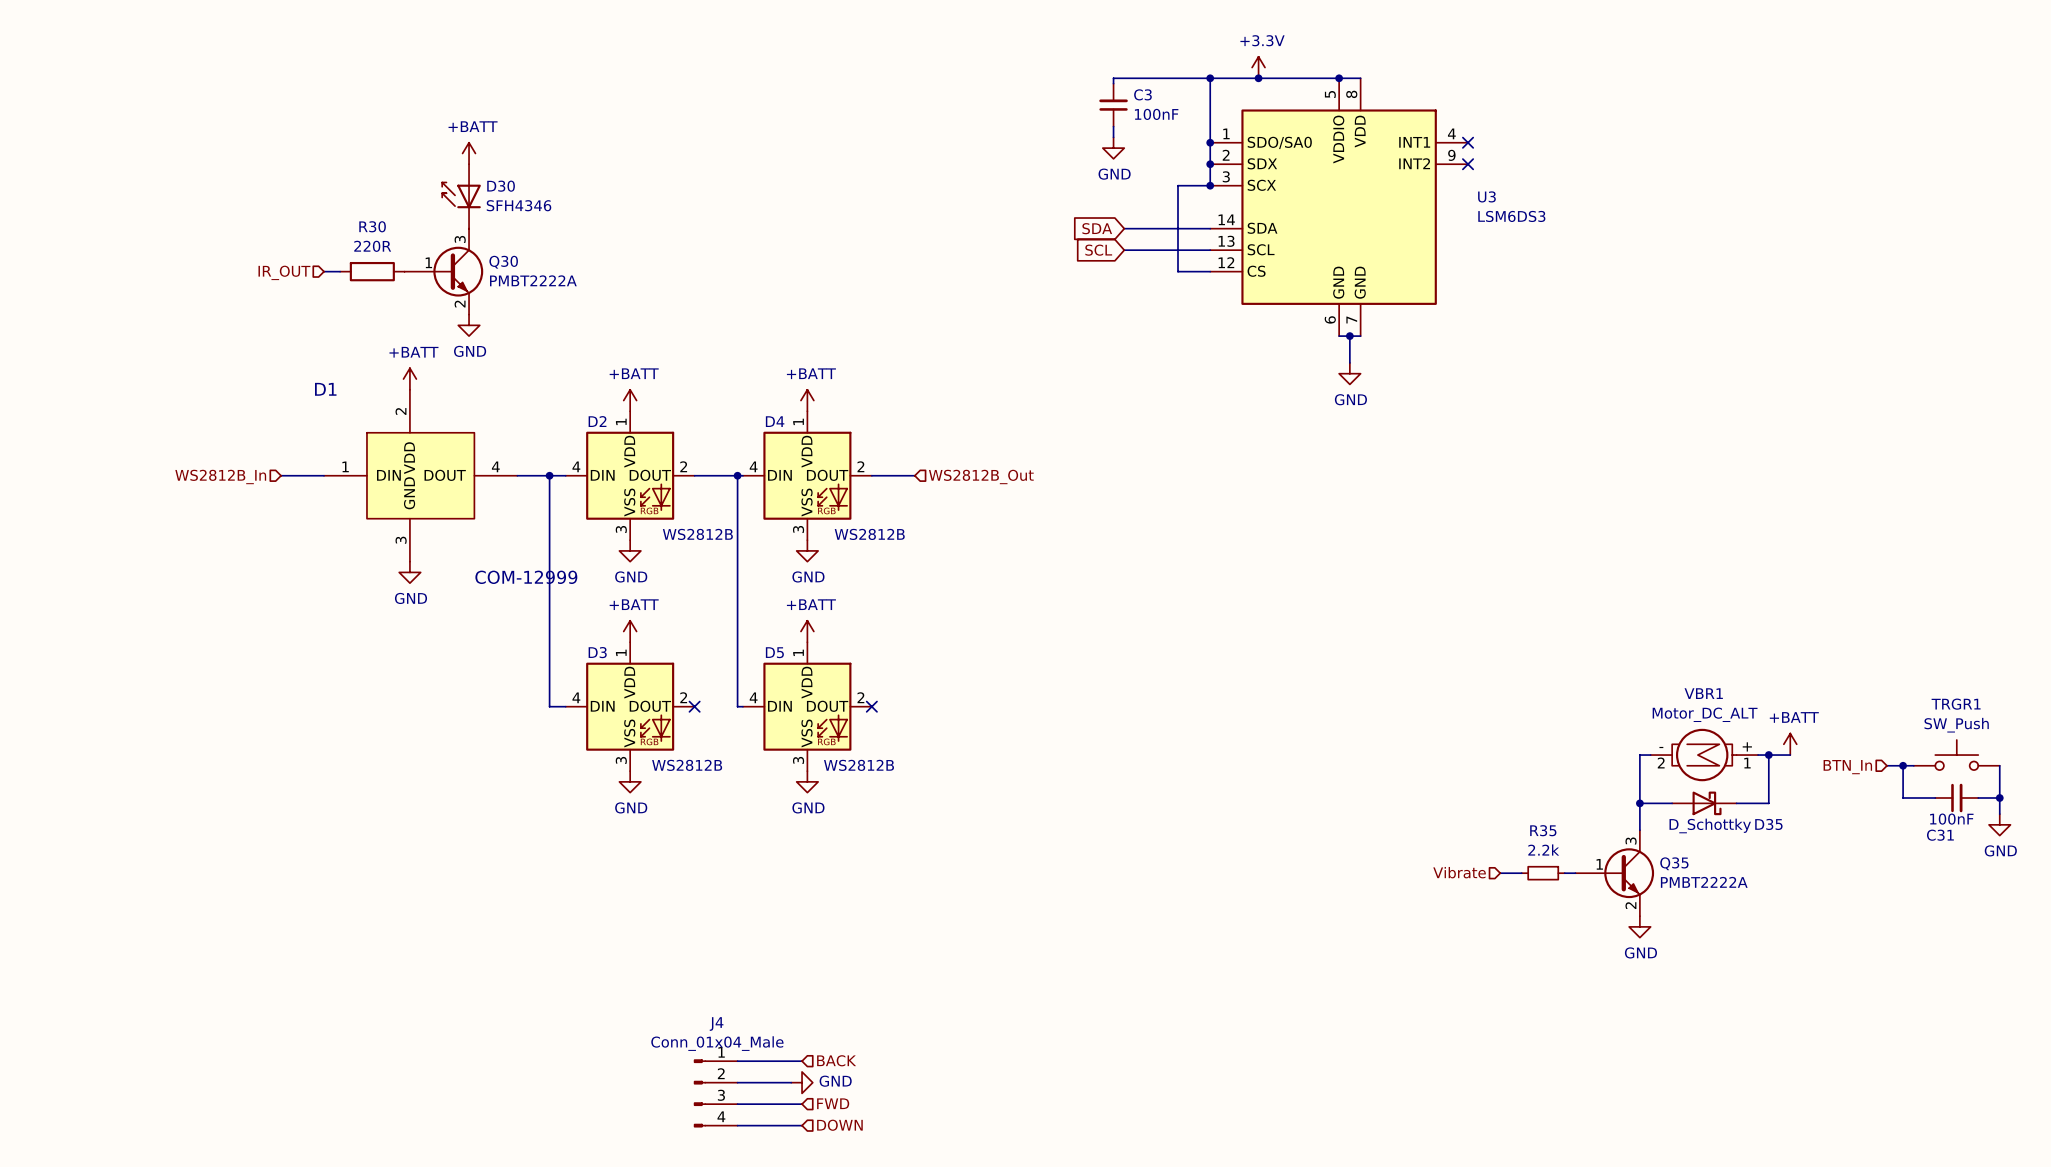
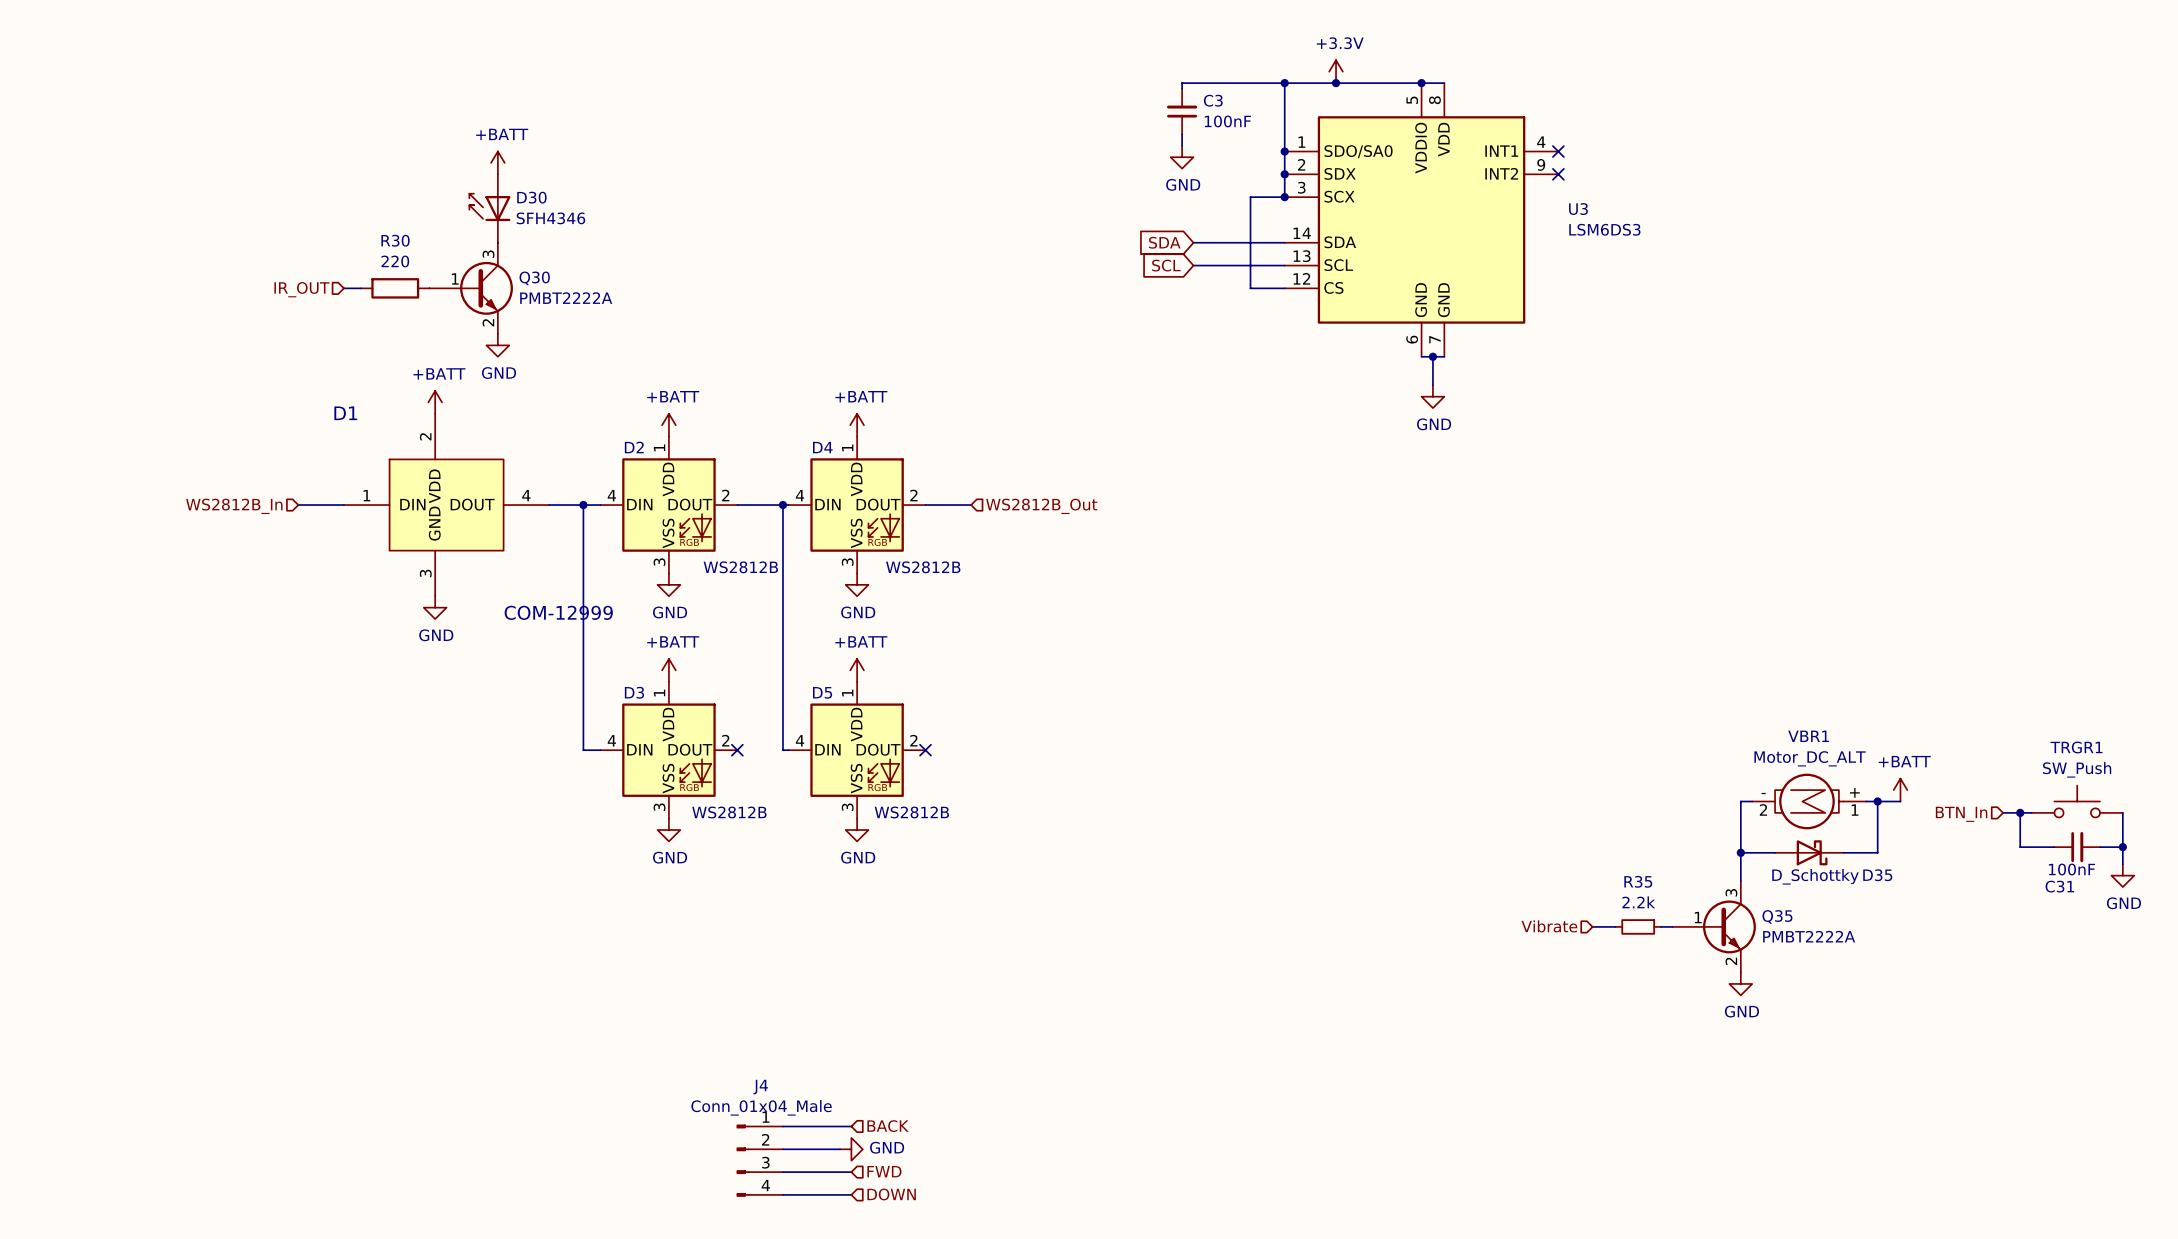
R30 value: 220R (372, 246) -> 220 (395, 261)

